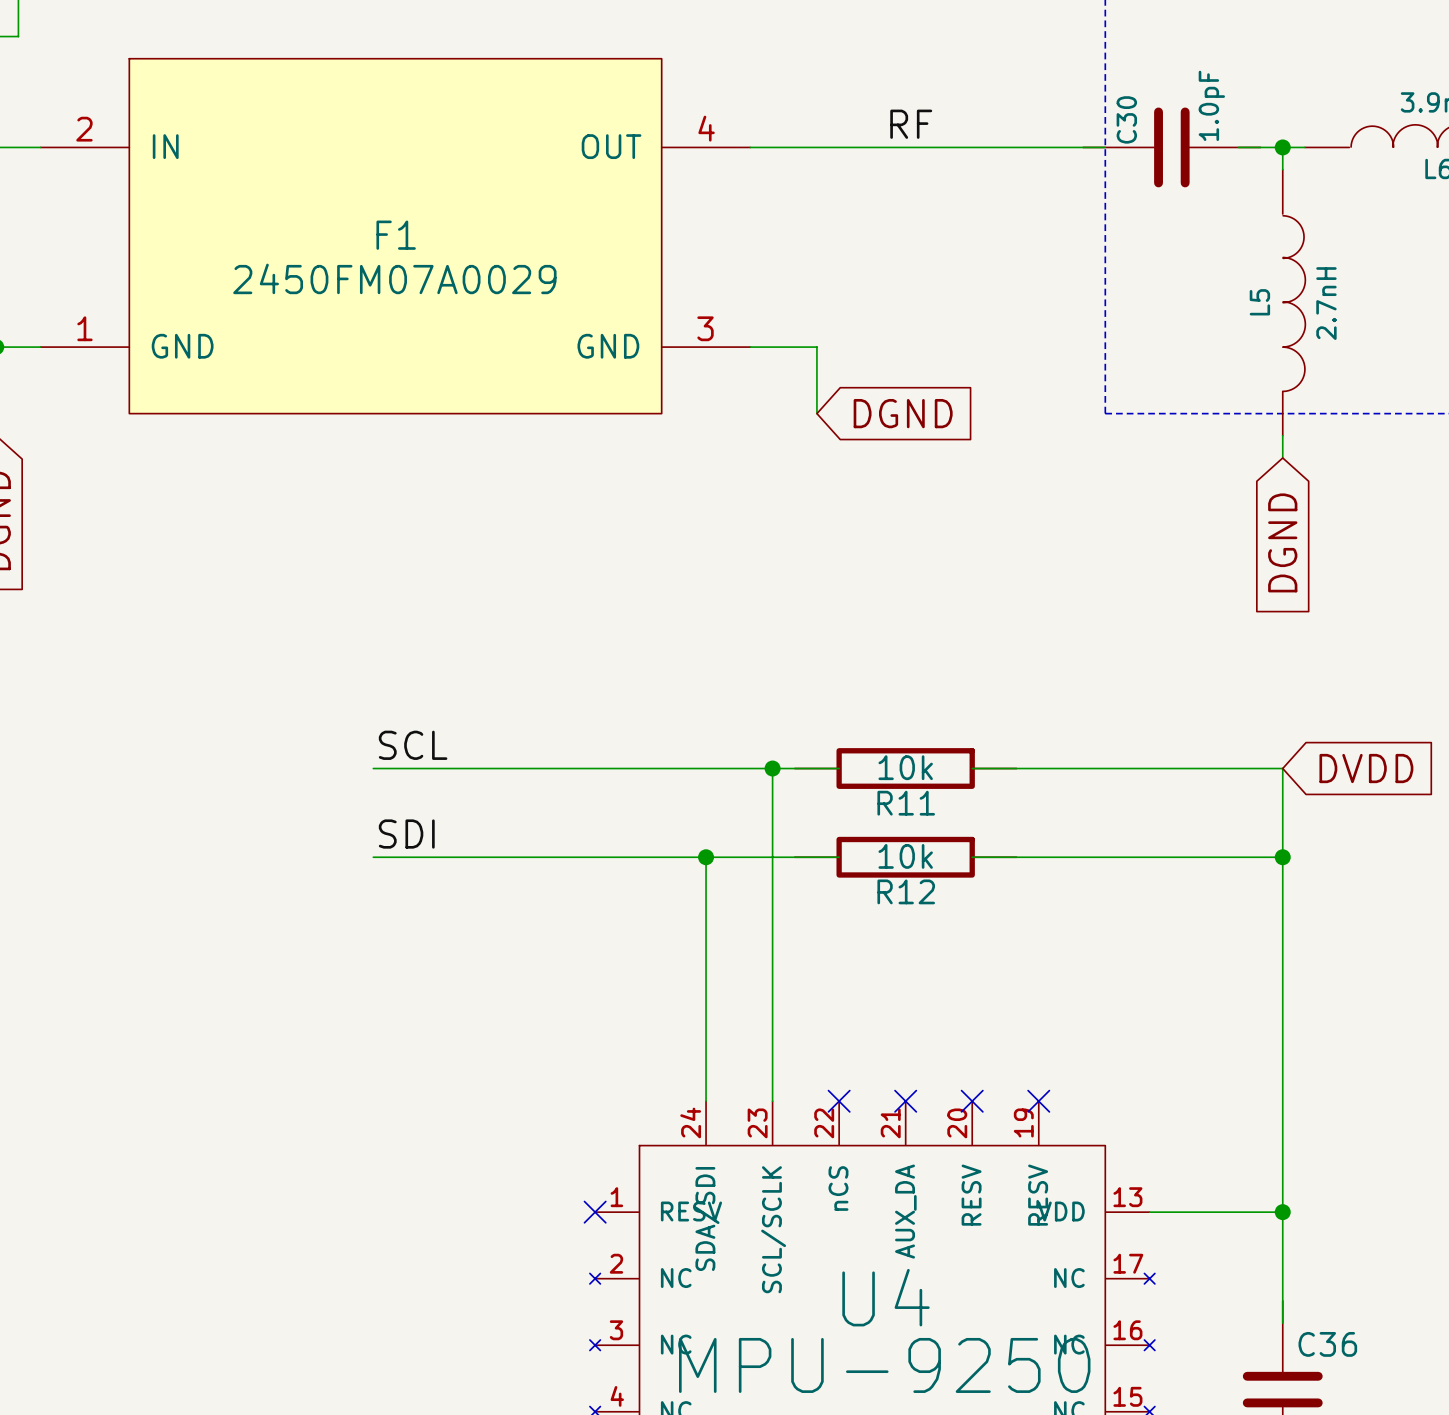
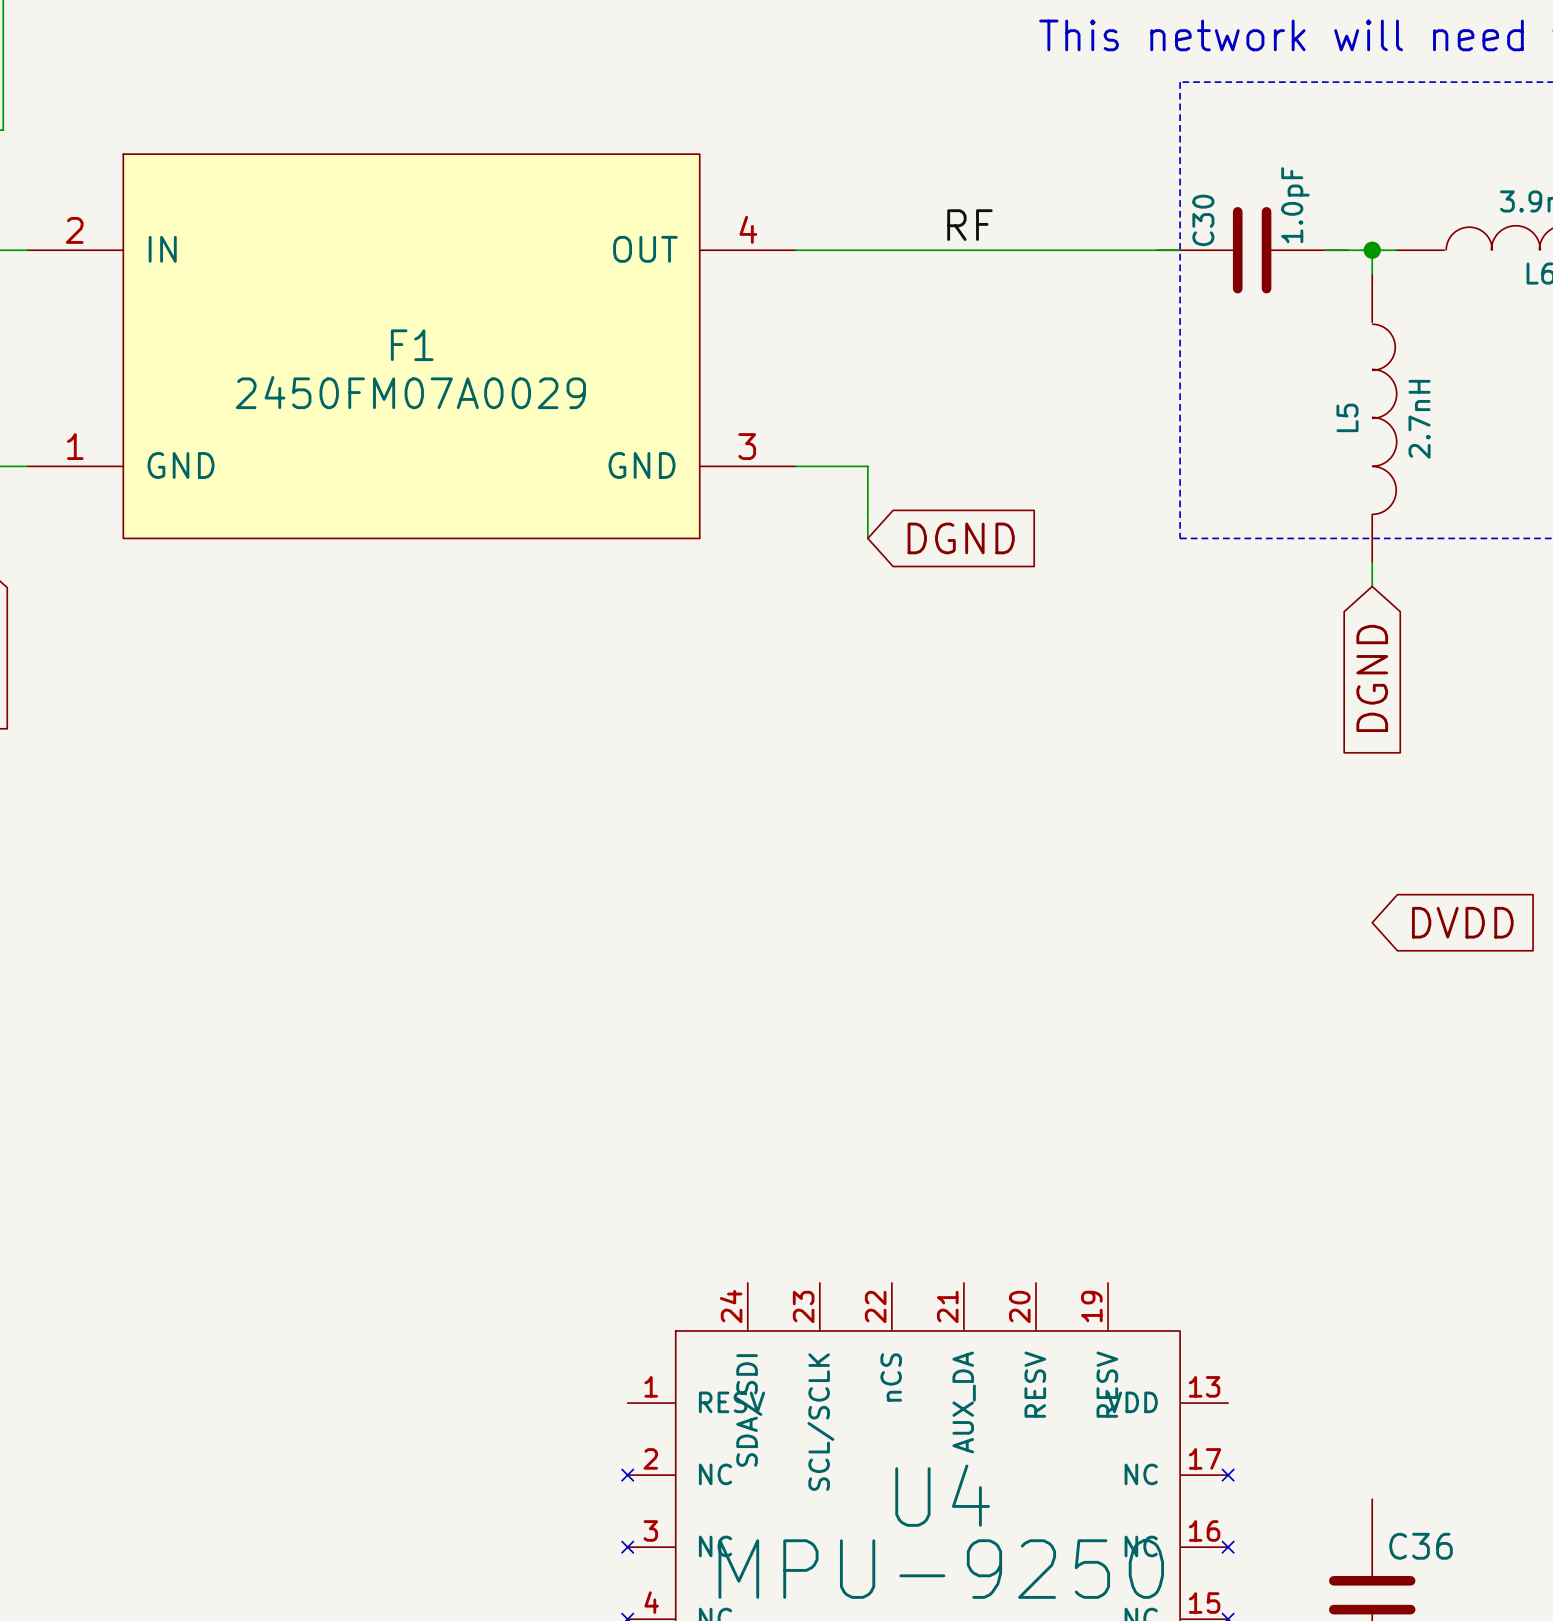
label: SCL (413, 745) -> none
wire: (373, 768) (839, 768) -> none
wire: (772, 768) (772, 1101) -> none
junction: (772, 768) -> none
R11: 10k (905, 768) -> none
wire: (972, 768) (1282, 768) (1282, 1323) -> none
label: SDI (406, 834) -> none
wire: (373, 857) (839, 857) -> none
wire: (706, 857) (706, 1101) -> none
junction: (706, 857) -> none
R12: 10k (905, 857) -> none
wire: (972, 857) (1282, 857) -> none
junction: (1282, 857) -> none
no-connect mark: (839, 1101) -> none
no-connect mark: (905, 1101) -> none
no-connect mark: (972, 1101) -> none
no-connect mark: (1038, 1101) -> none
no-connect mark: (595, 1212) -> none
wire: (1149, 1212) (1282, 1212) -> none
junction: (1282, 1212) -> none

